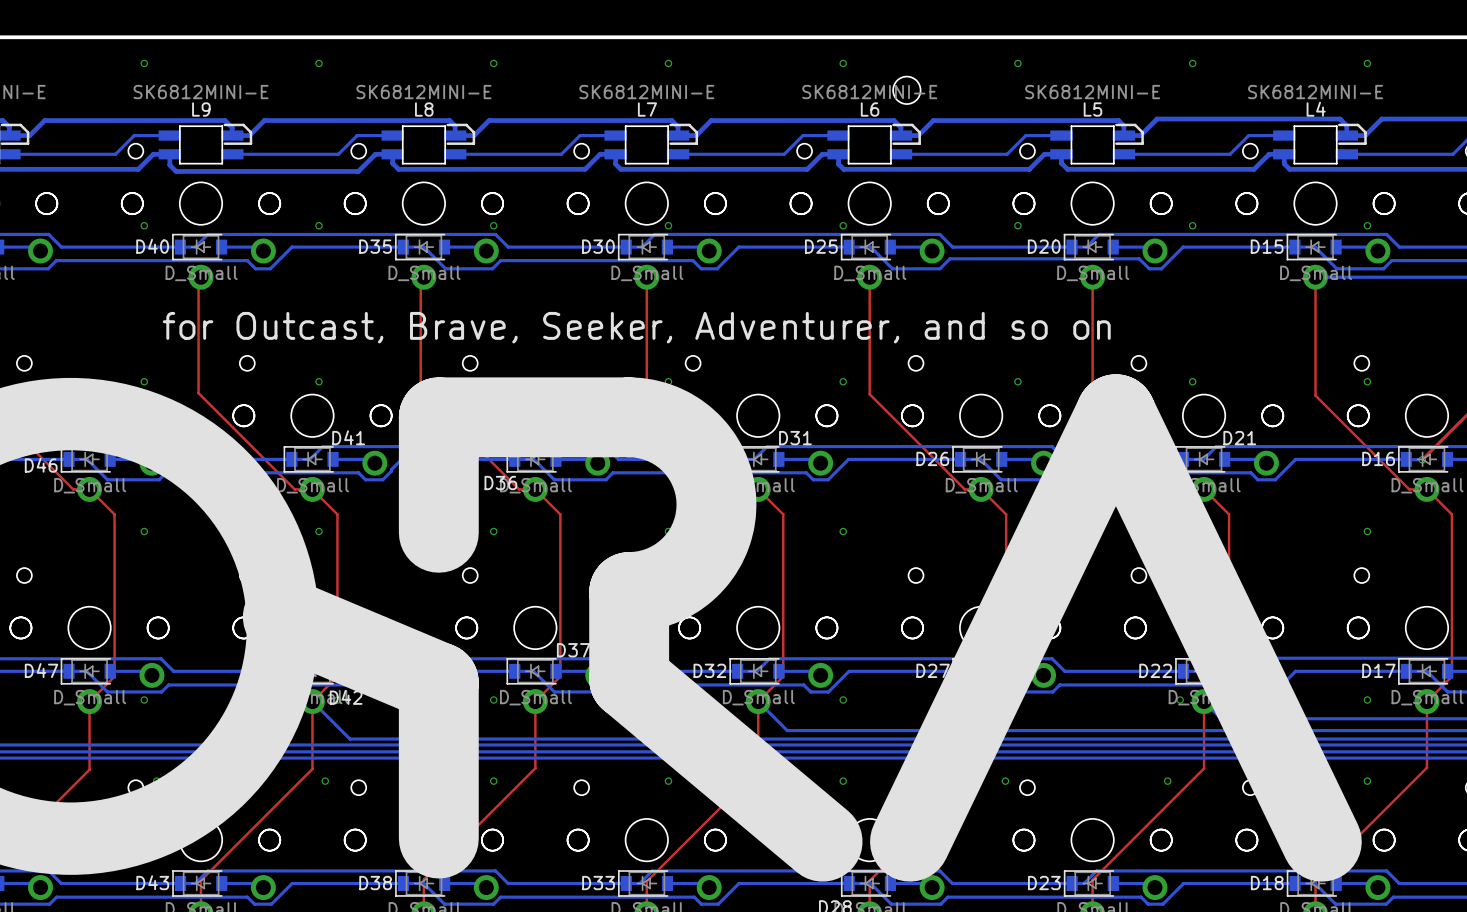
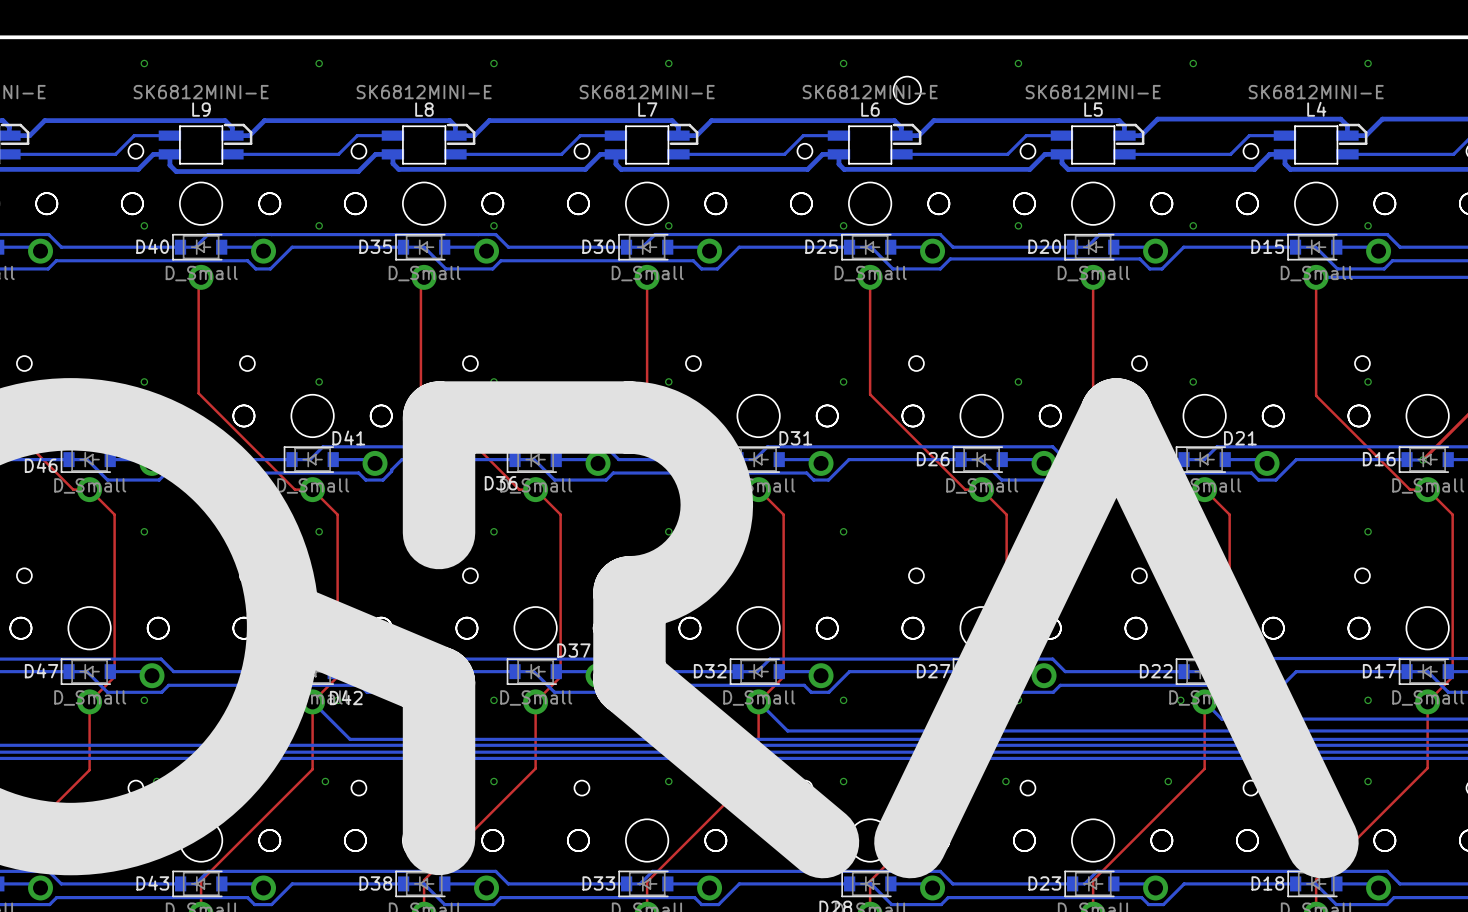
text: for Outcast, Brave, Seeker, Adventurer, and so on (636, 327) -> none
line width: thick (438, 532) (438, 417) (637, 417) (662, 423) (684, 437) (696, 449) (709, 471) (716, 496) (714, 521) (706, 545) (696, 560) (684, 572) (670, 581) (654, 588) (629, 592) (629, 679) (822, 841) -> thin (439, 533) (439, 417) (638, 417) (662, 424) (684, 437) (697, 449) (710, 471) (716, 496) (715, 521) (706, 546) (697, 560) (684, 572) (670, 582) (654, 588) (629, 592) (629, 679) (823, 842)
line width: thick (282, 617) (438, 682) (438, 838) -> thin (282, 617) (439, 682) (439, 838)
line width: thick (1321, 841) (1115, 414) (909, 841) -> thin (1322, 842) (1116, 414) (910, 842)

